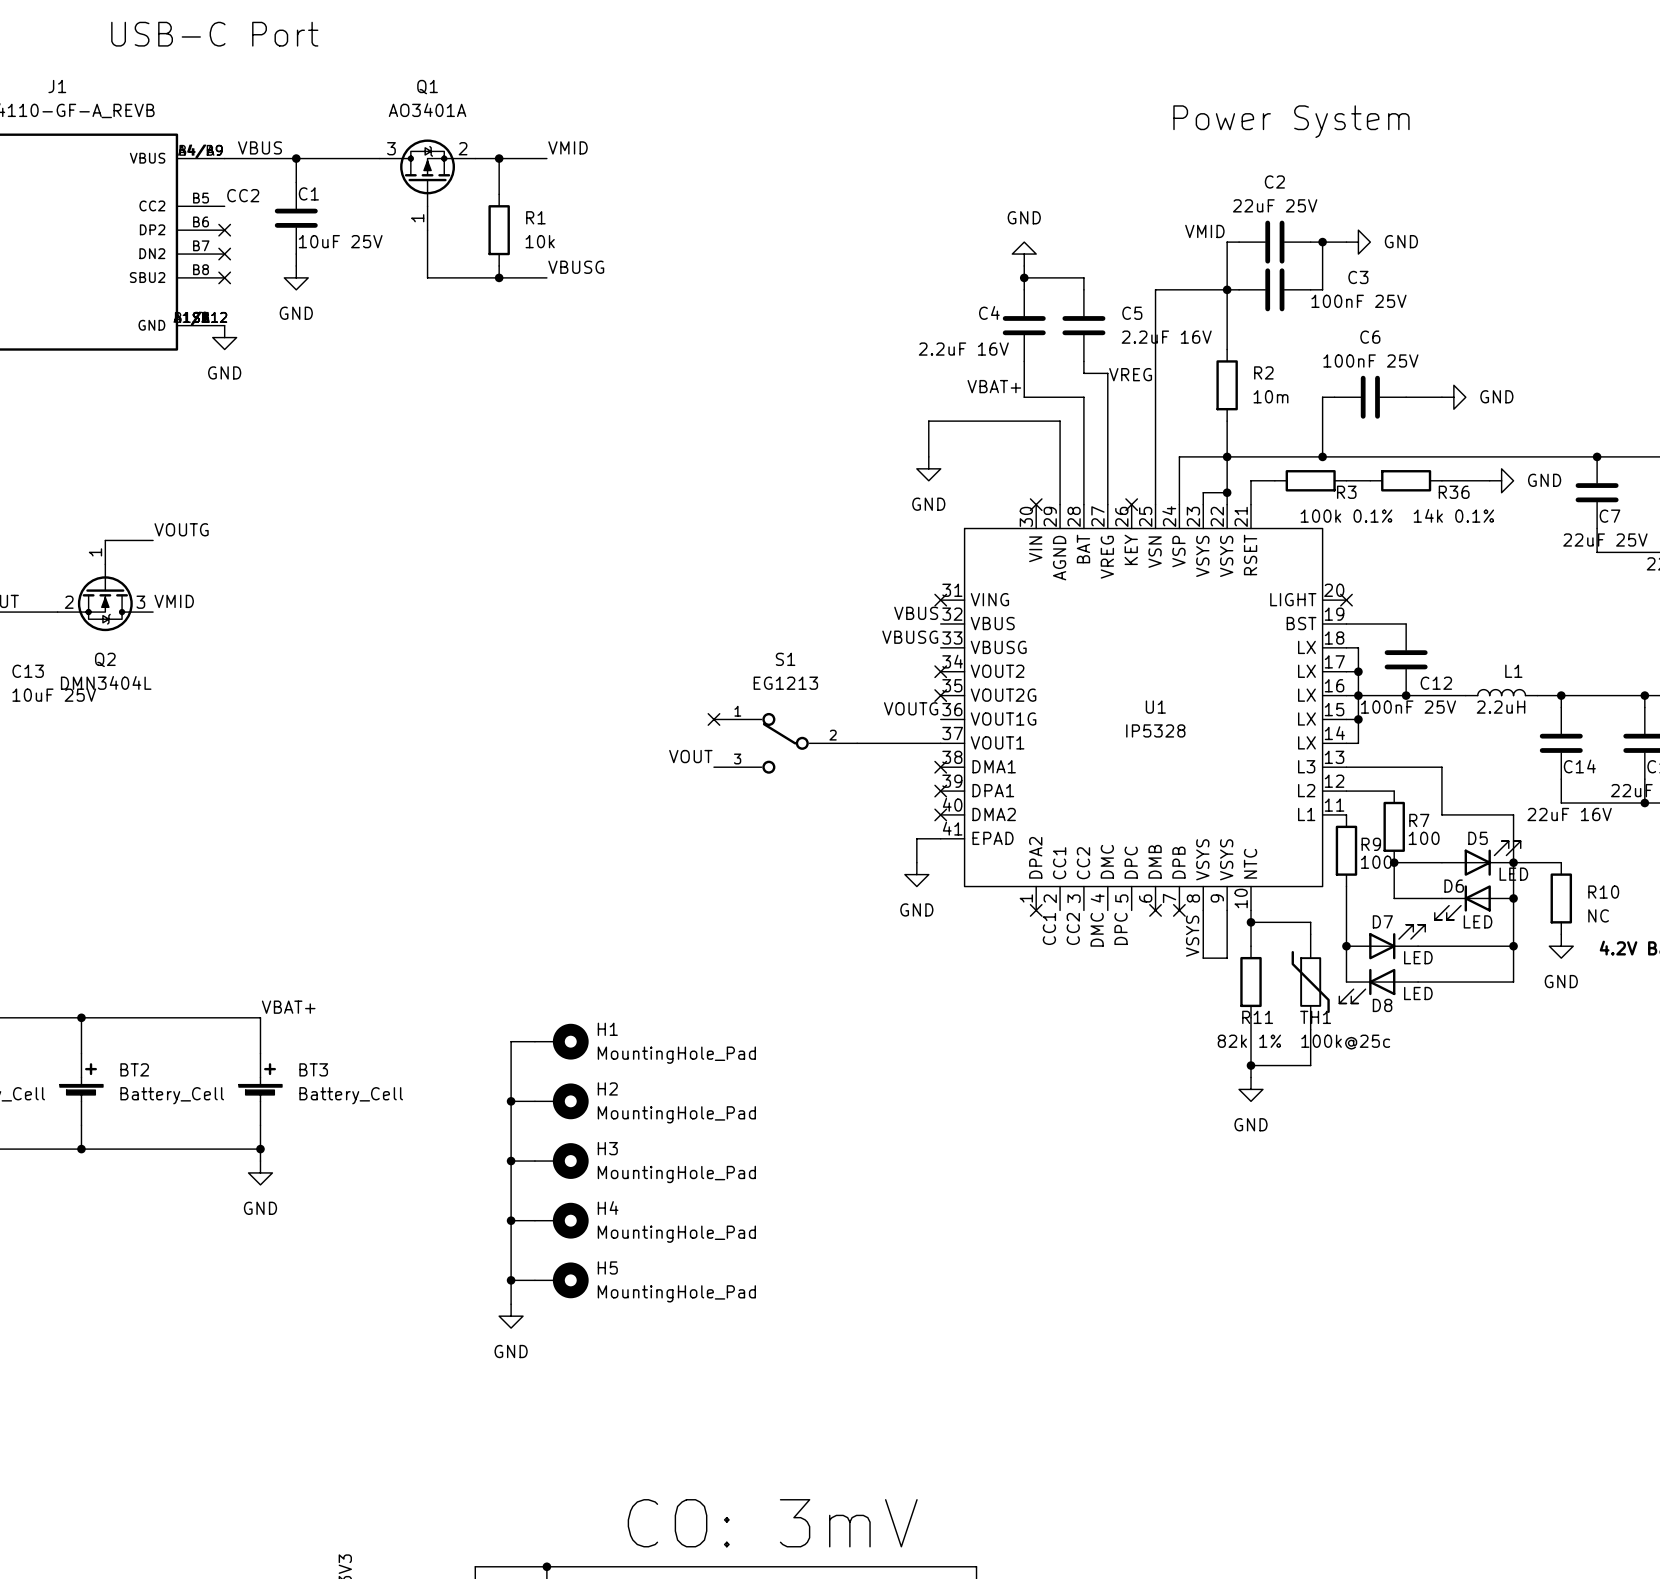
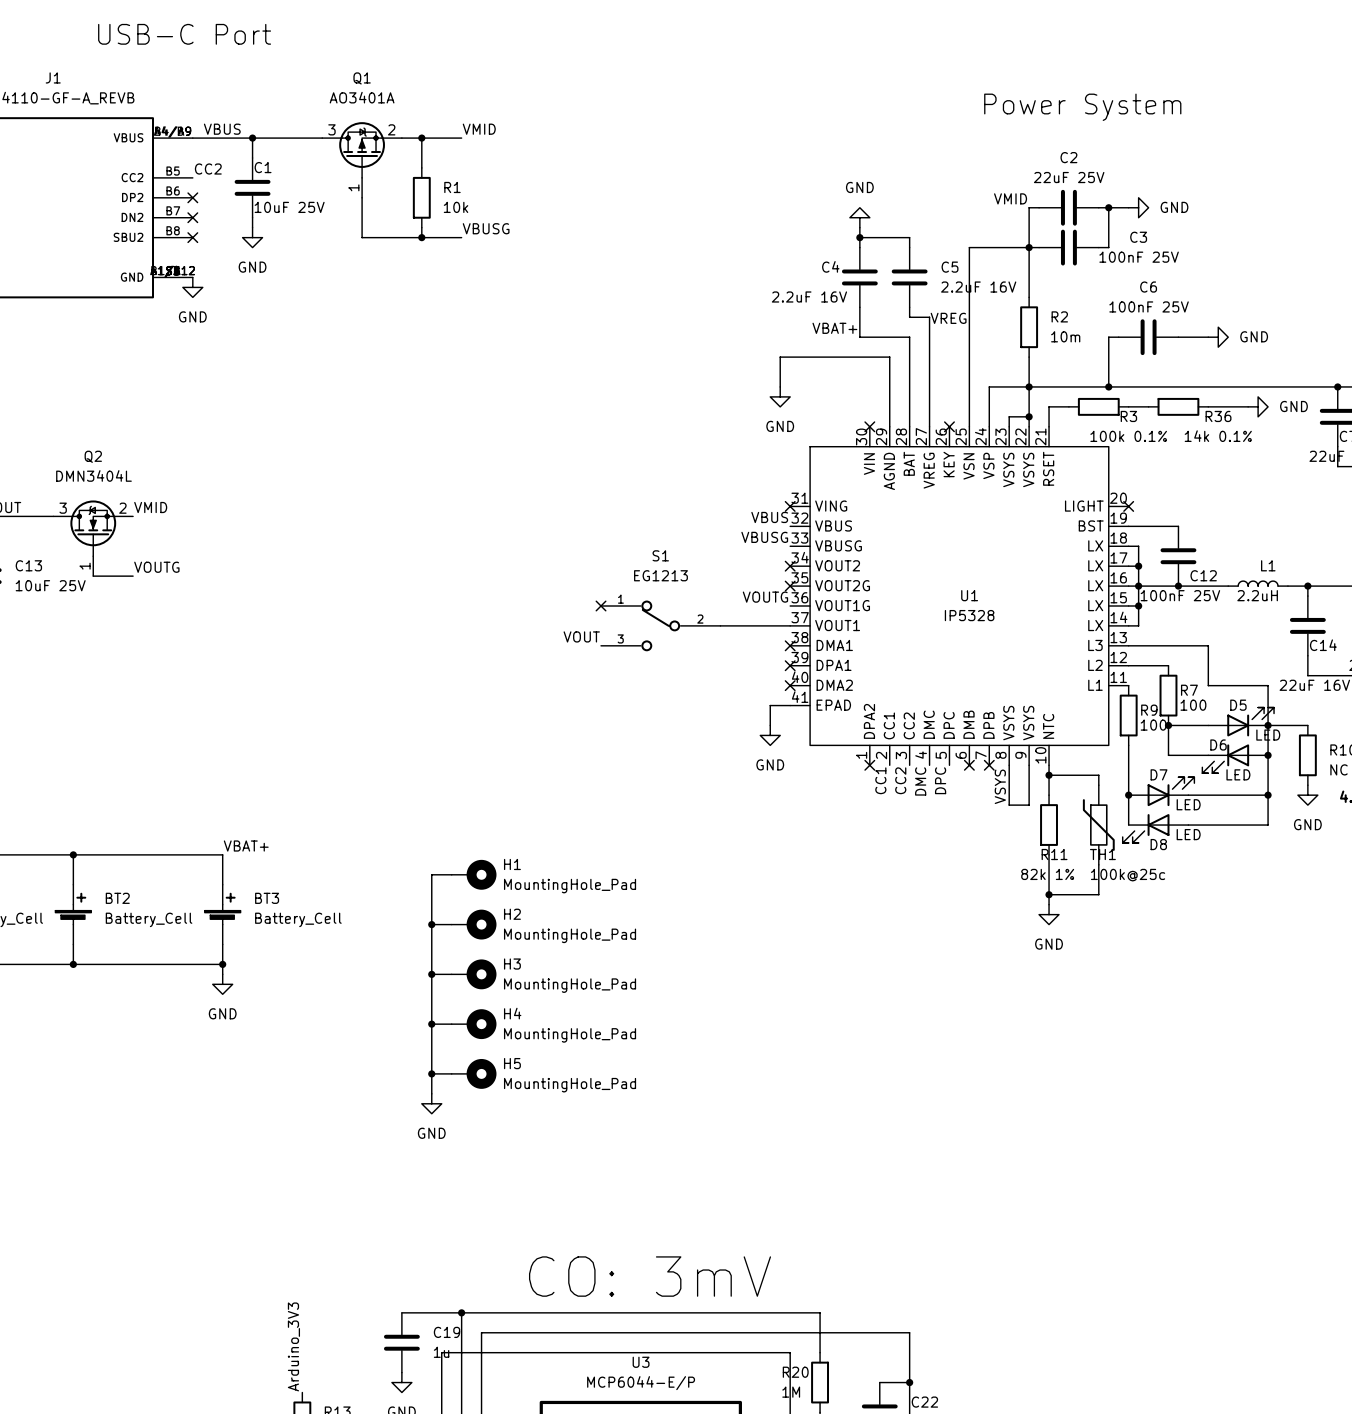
label position: VOUTG (181, 529) -> VOUTG (156, 567)
wire: (105, 540) (153, 540) -> (93, 576) (133, 576)
Q2 rotation: 0° (105, 597) -> 180° (93, 528)
Q2 name position: Q2 (105, 659) -> Q2 (93, 456)
Q2 value position: DMN3404L (106, 682) -> DMN3404L (93, 475)

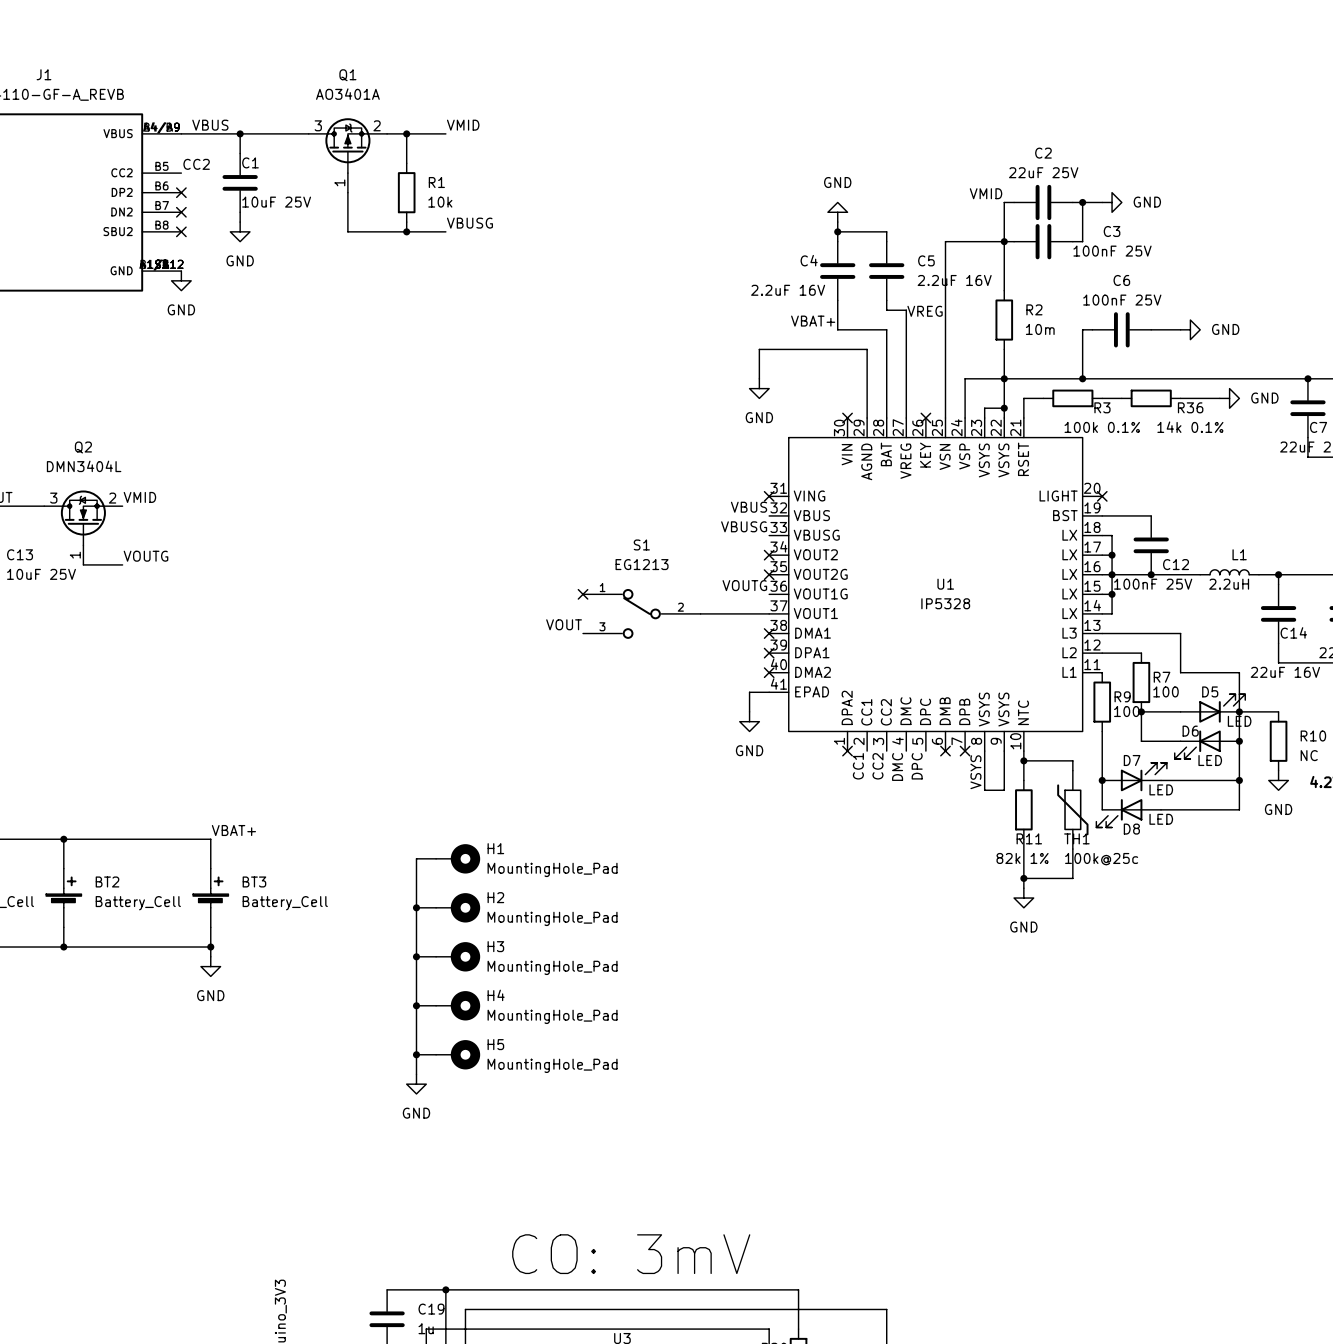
text: USB-C Port (184, 34) -> none
text: Power System (1082, 107) -> none

